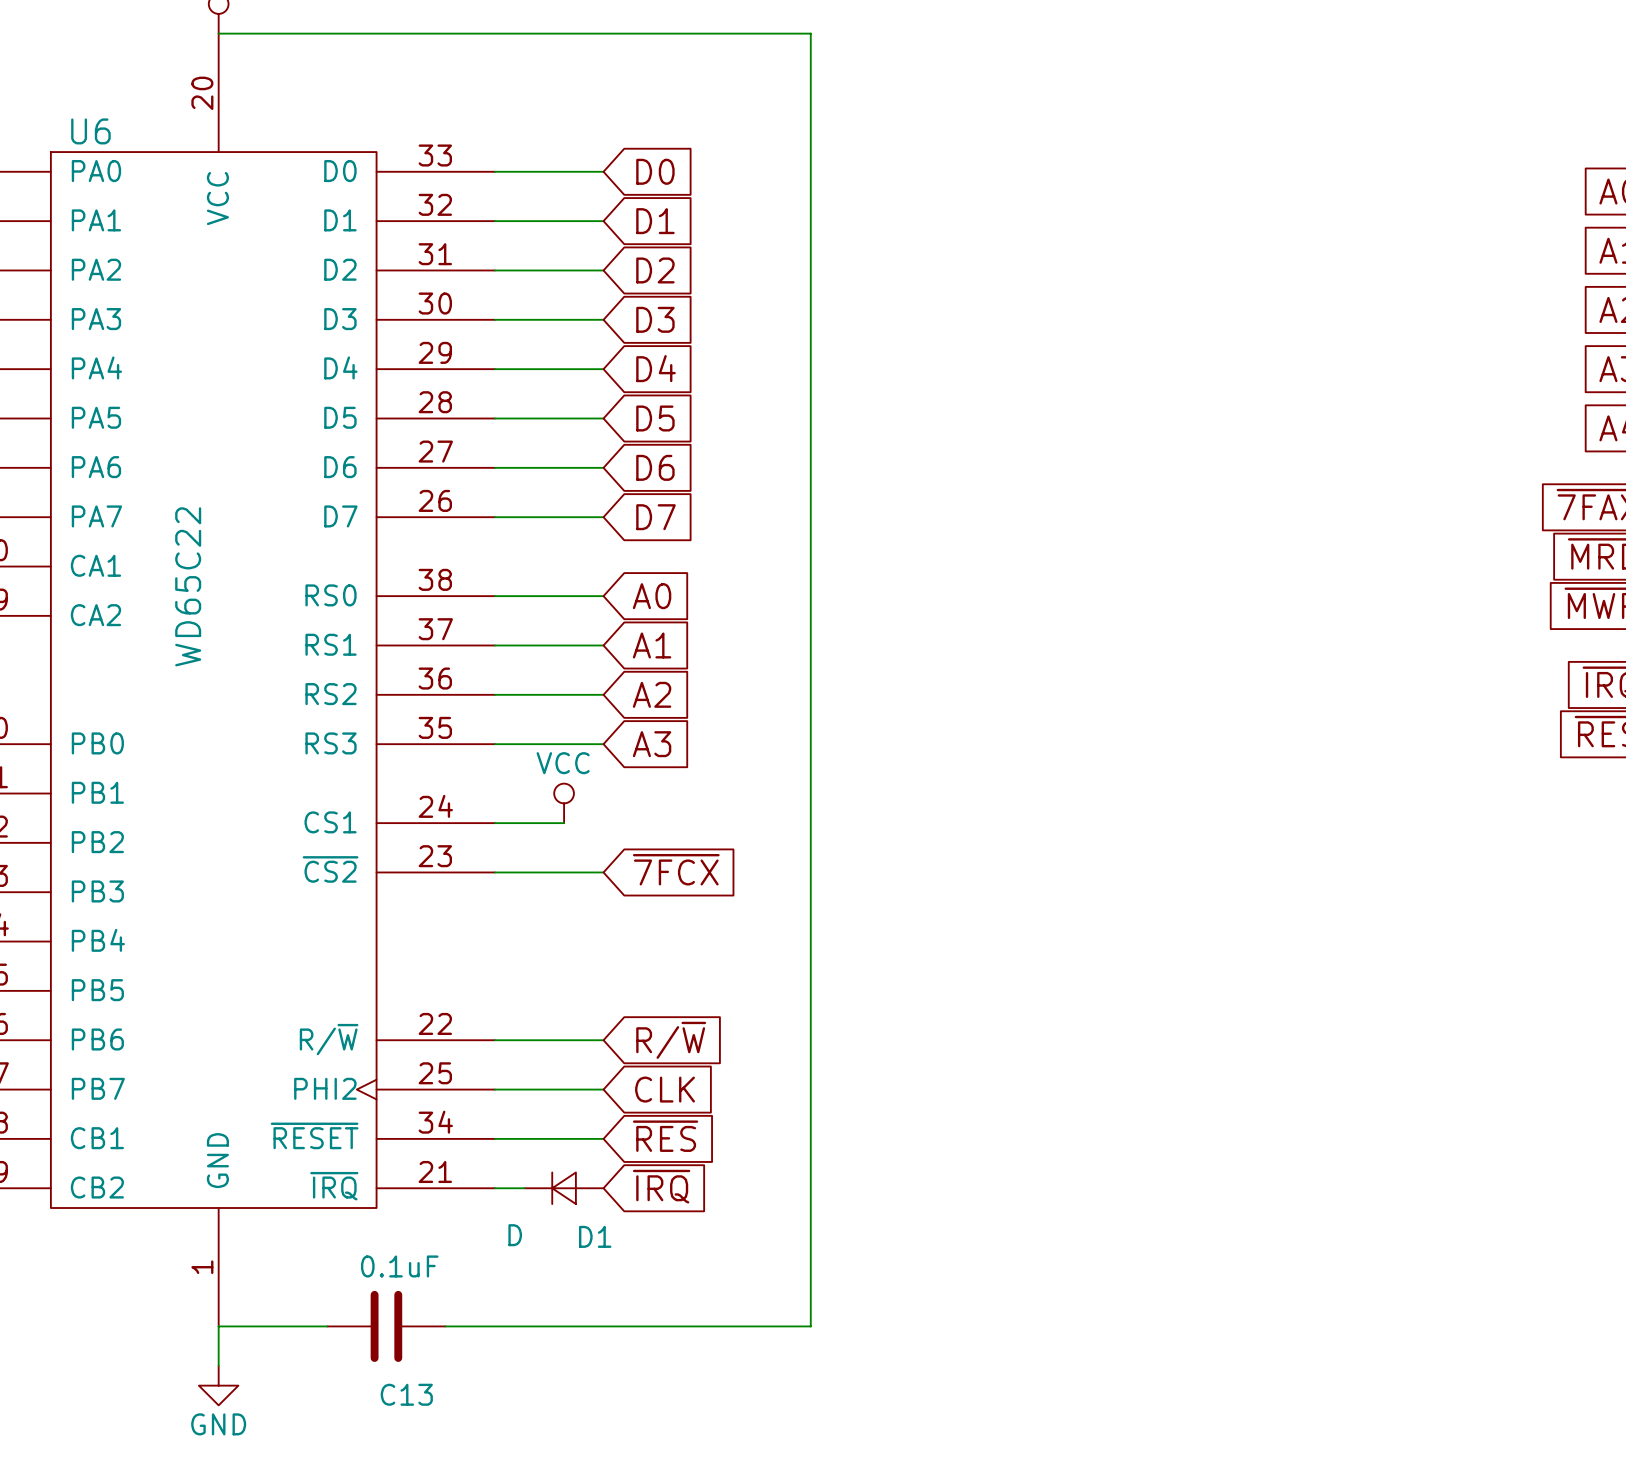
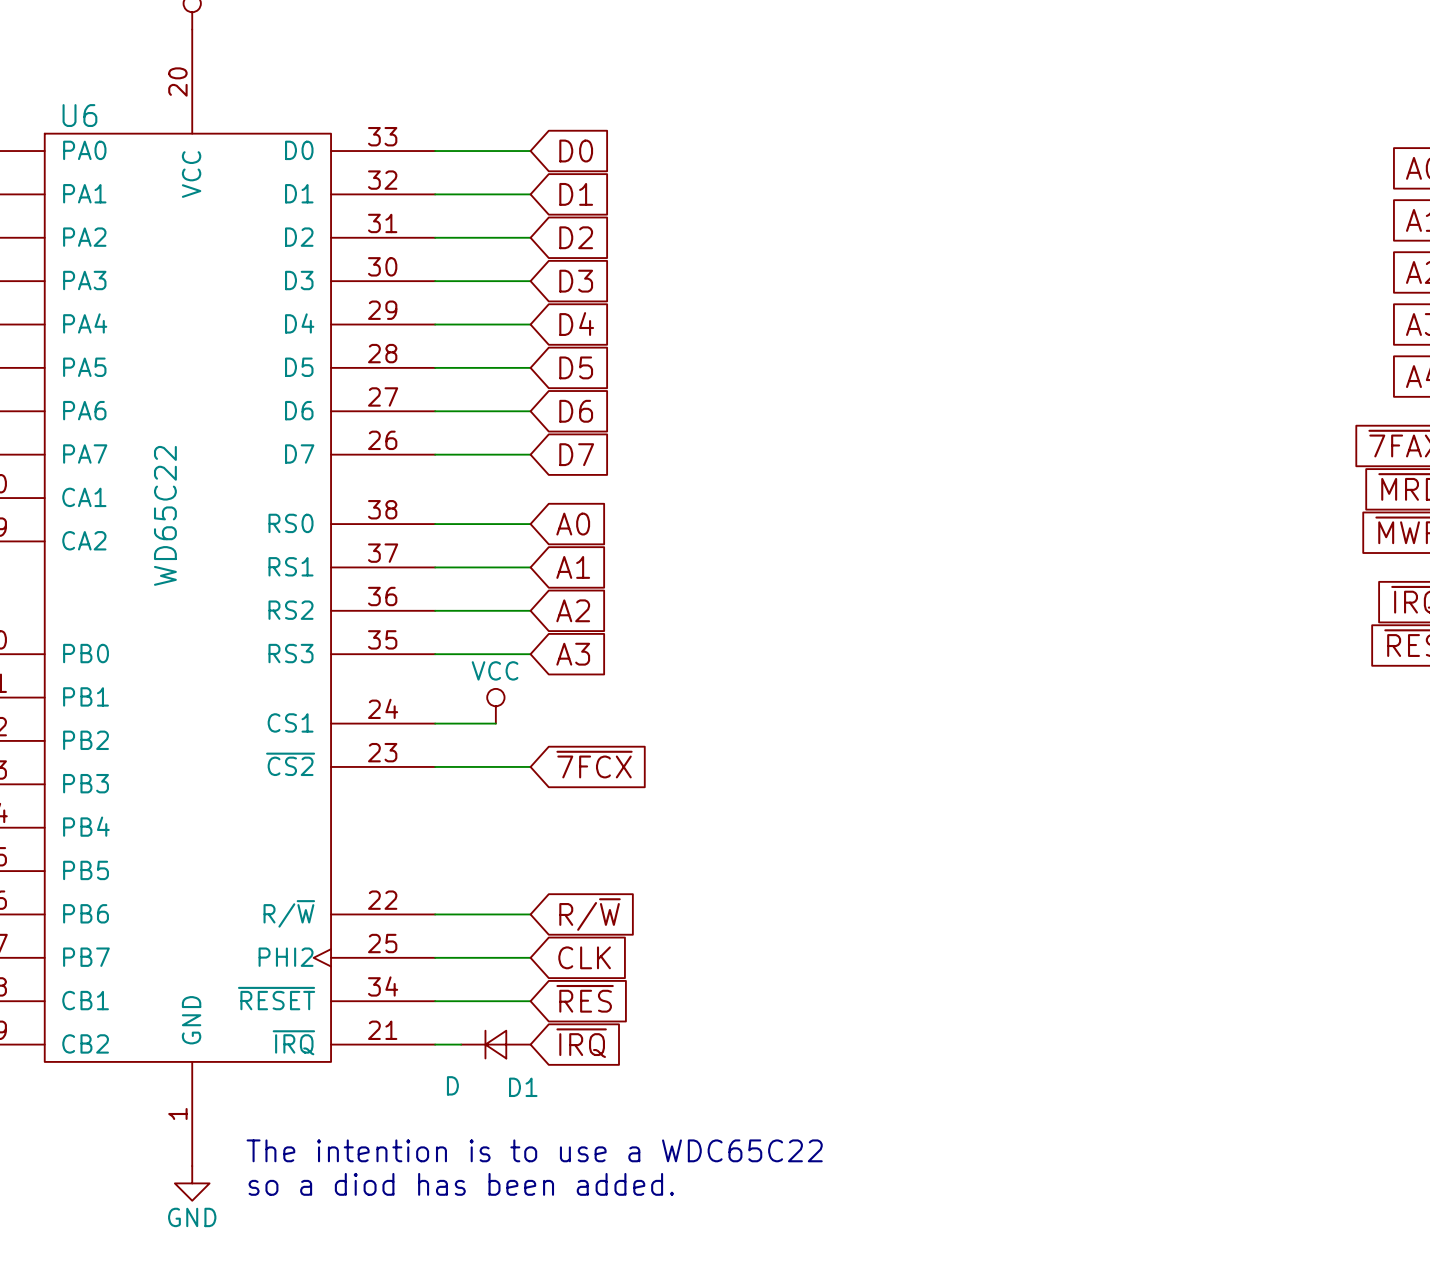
wire: (218, 33) (810, 33) (810, 1326) (445, 1326) -> none
text: none -> The intention is to use a WDC65C22 (534, 1150)
wire: (327, 1326) (218, 1326) (218, 1365) -> none
C13: 0.1uF (386, 1326) -> none
text: none -> so a diod has been added. (461, 1184)
power symbol position: GND (218, 1385) -> GND (192, 1183)

